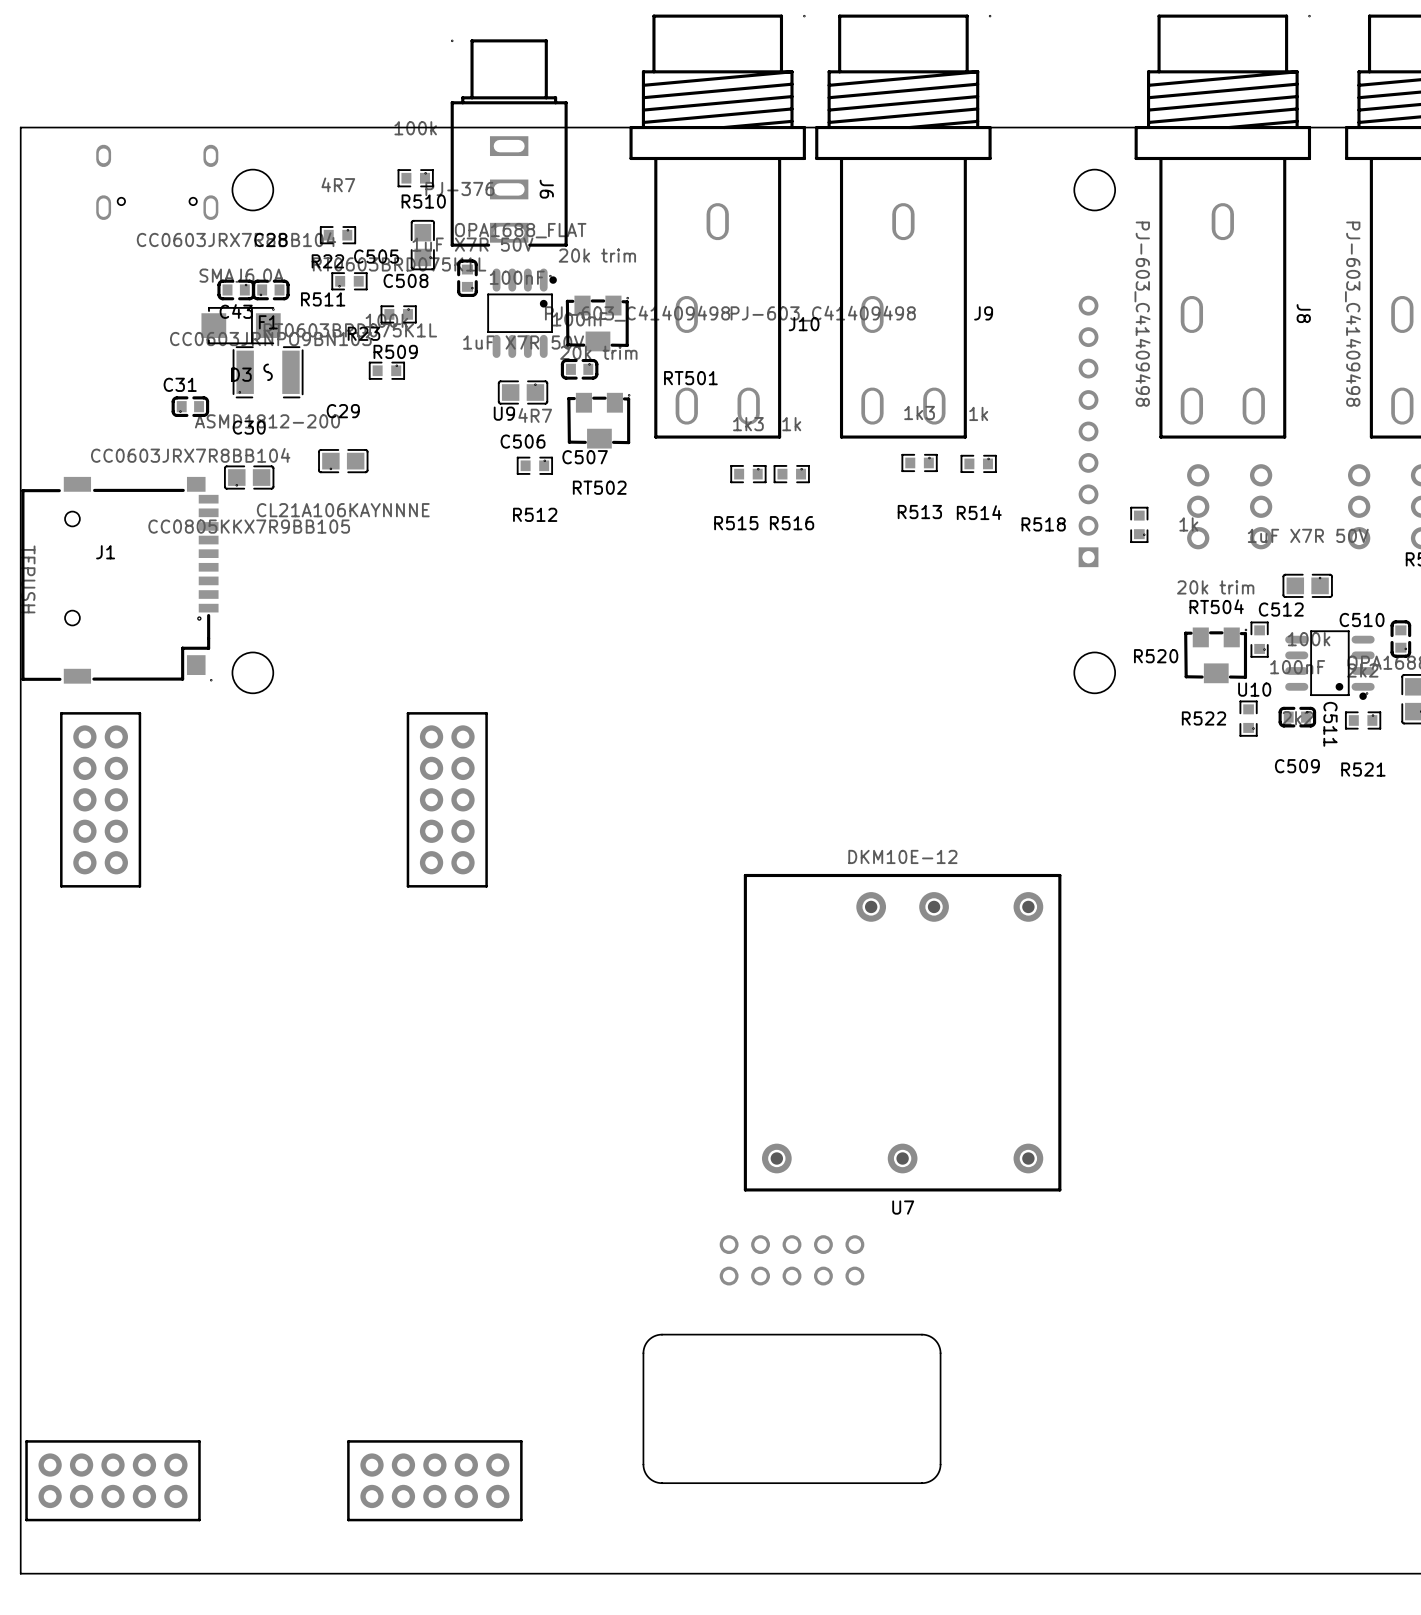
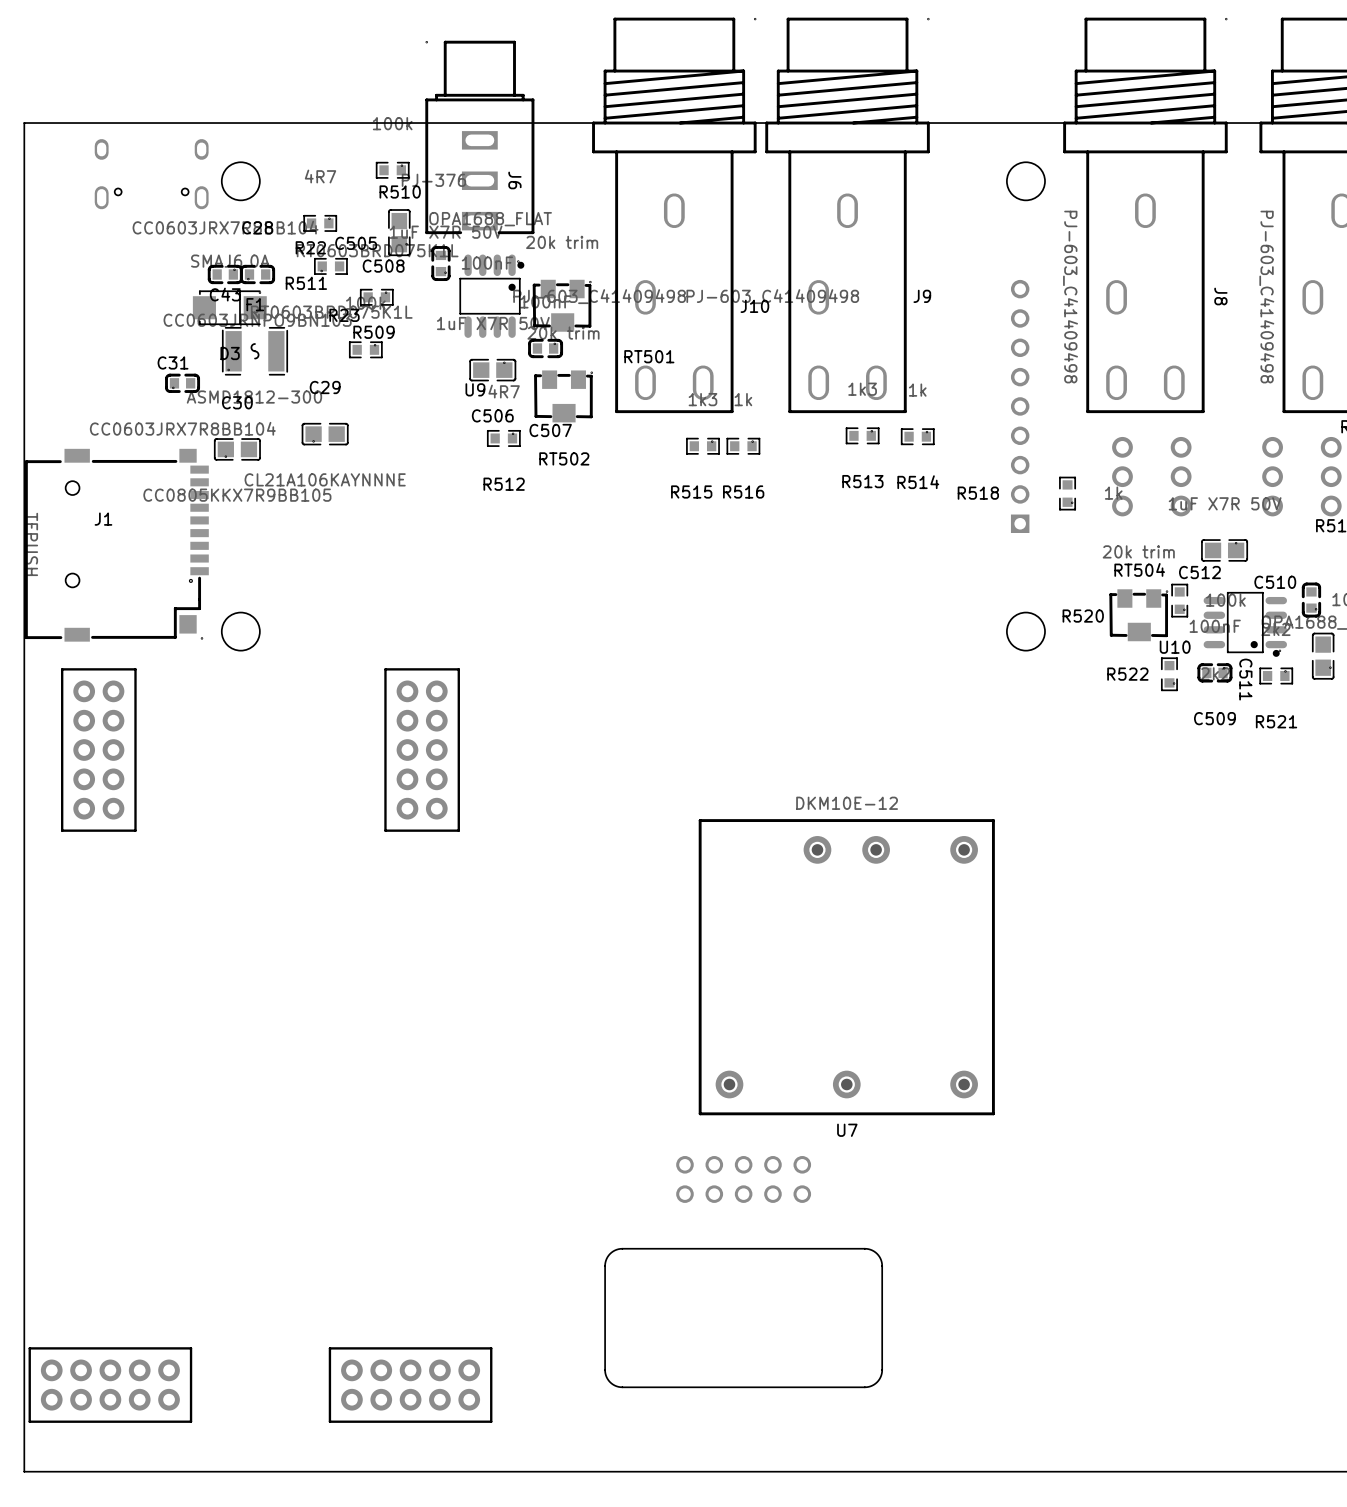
F1 value: ASMD1812-200 (267, 421) -> ASMD1812-300 (254, 397)

